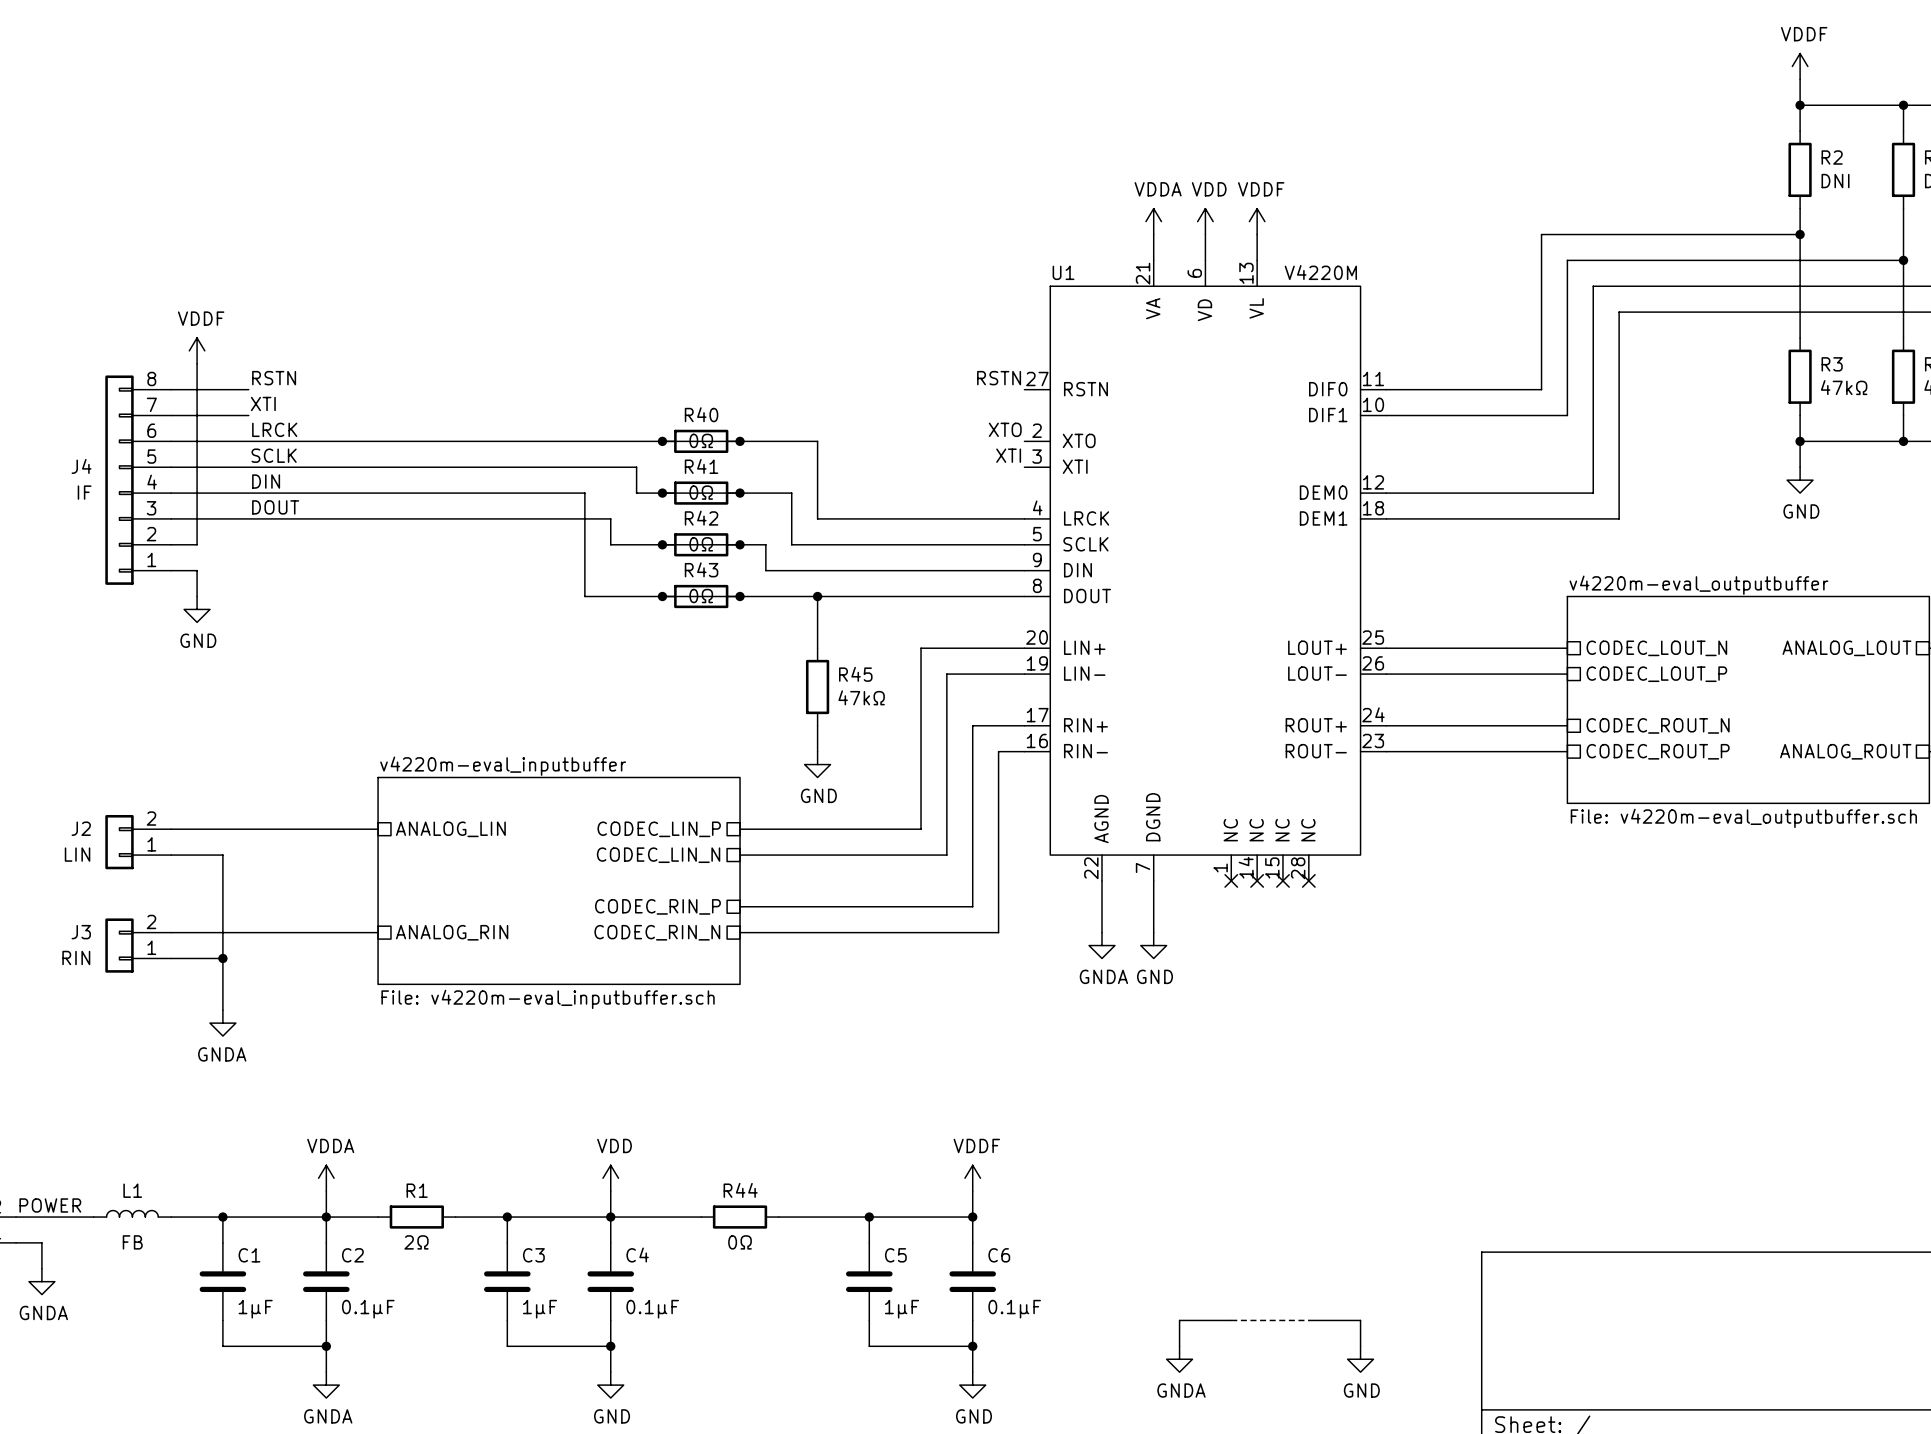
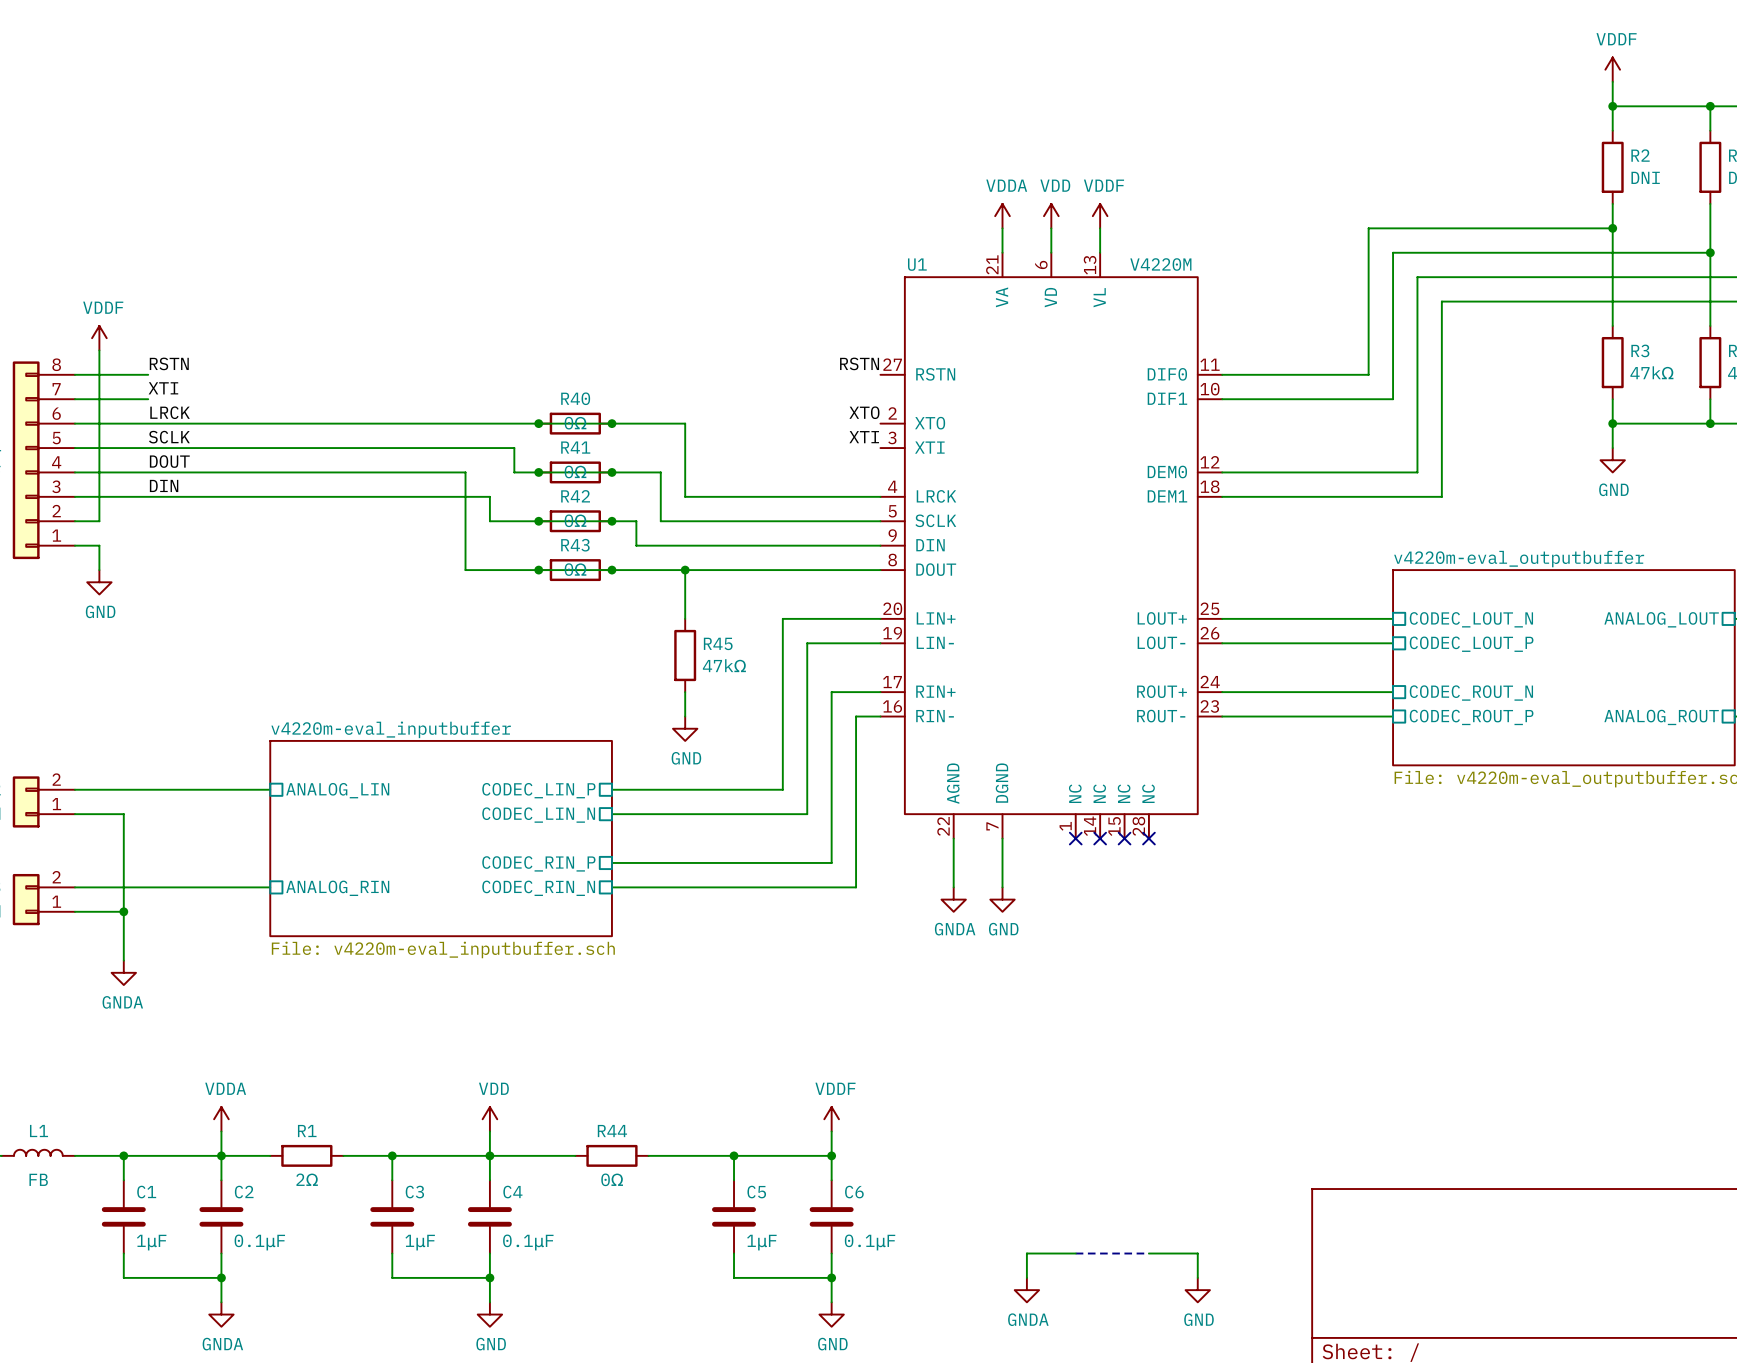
label: DIN (266, 481) -> DOUT (169, 461)
label: DOUT (275, 507) -> DIN (164, 485)

